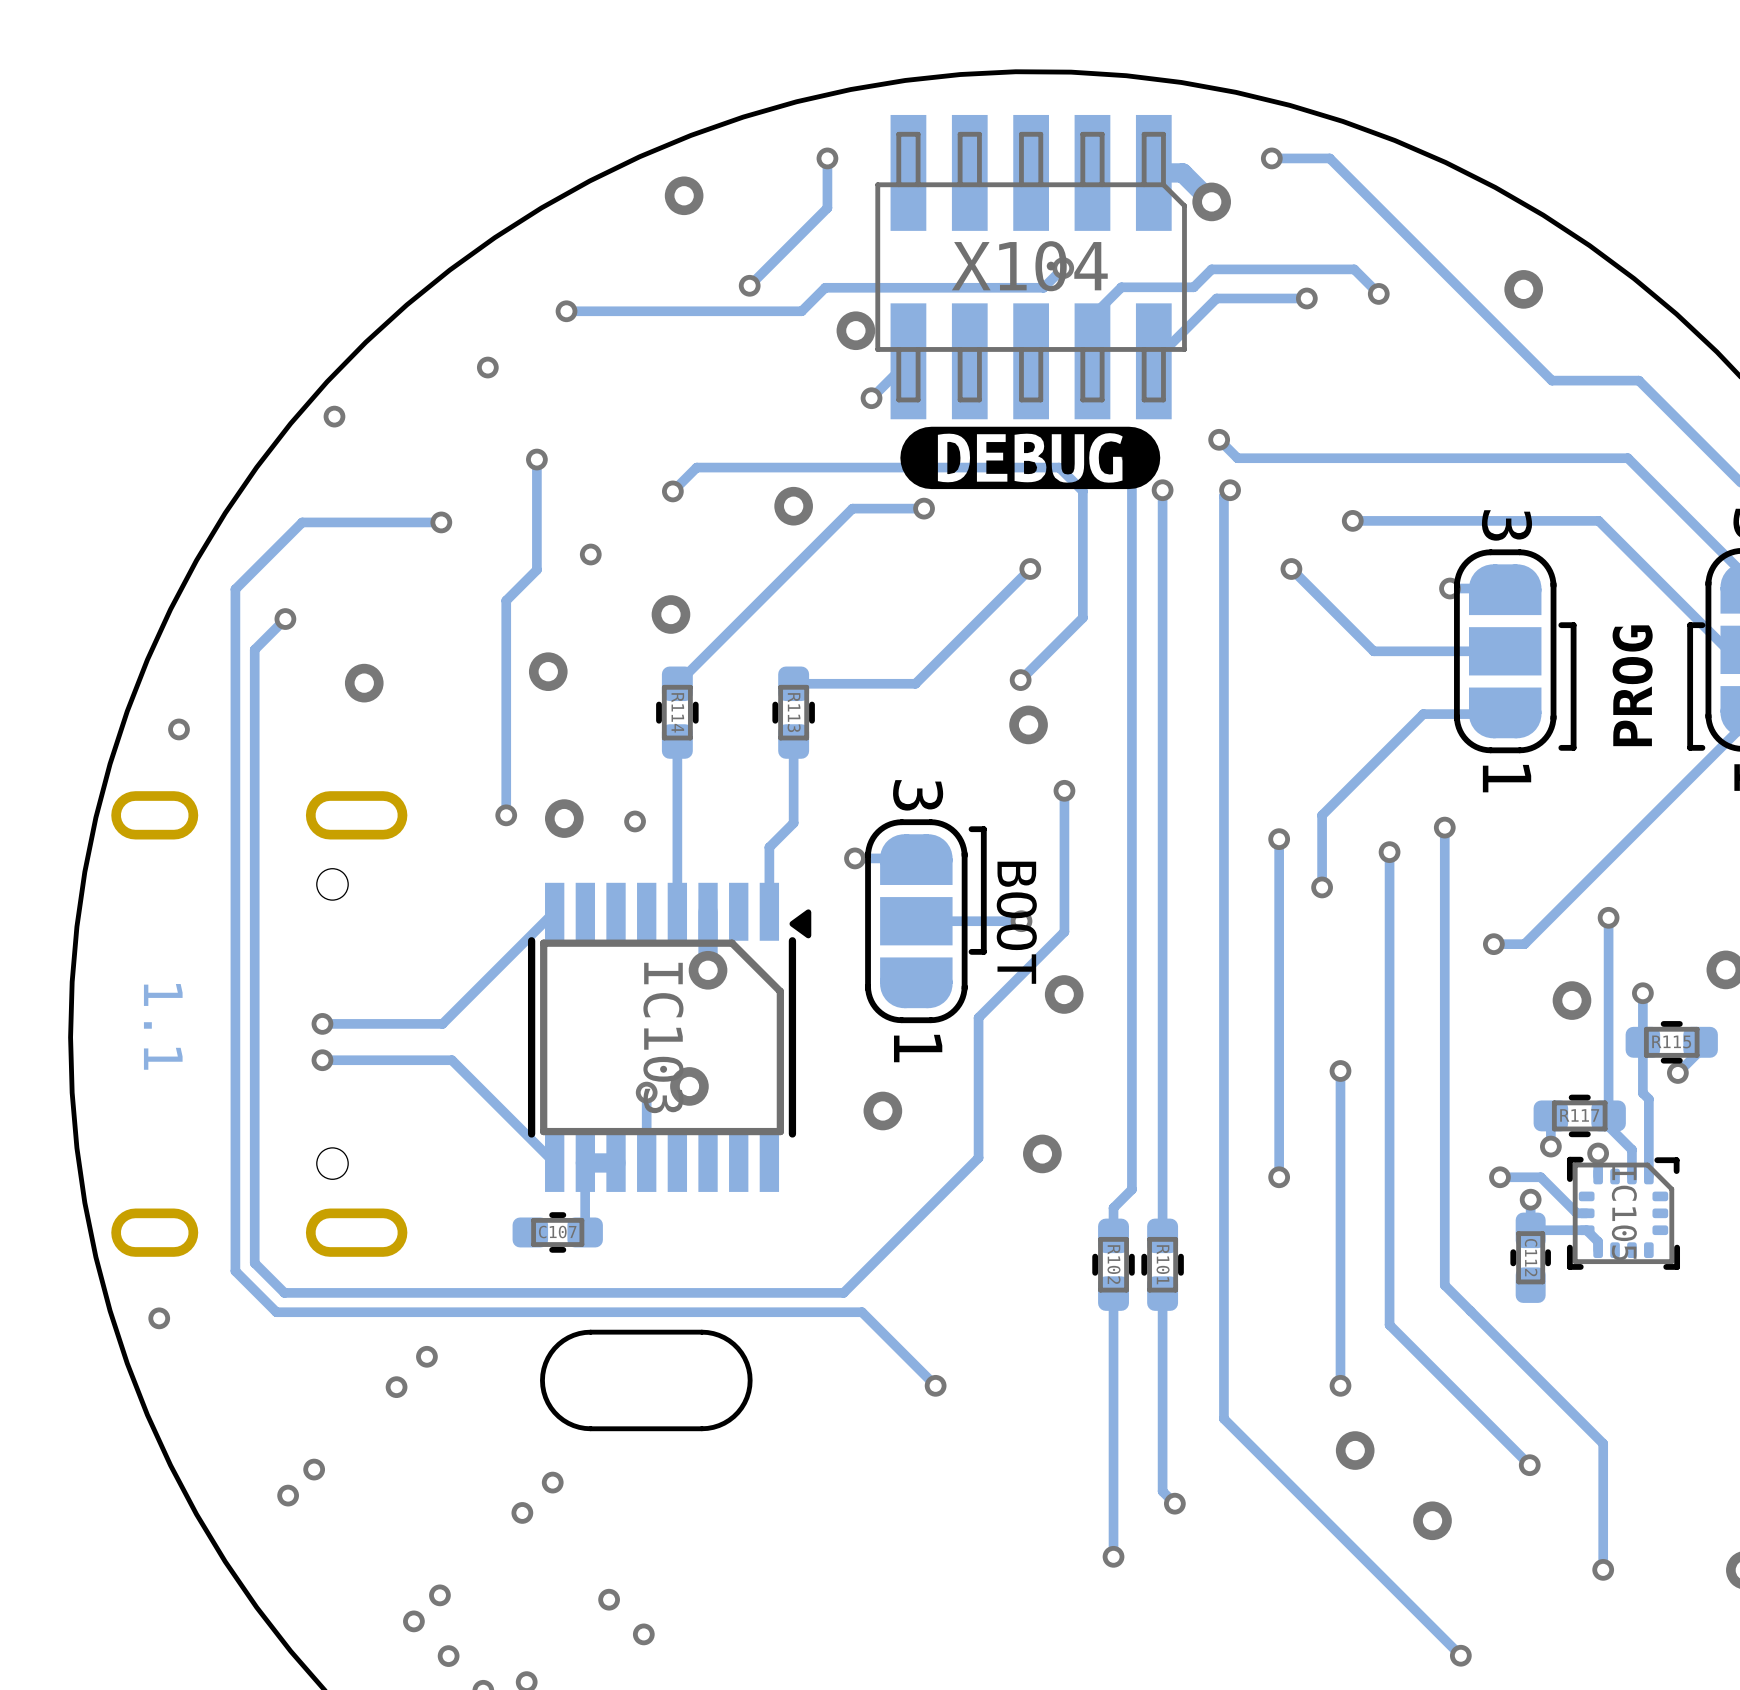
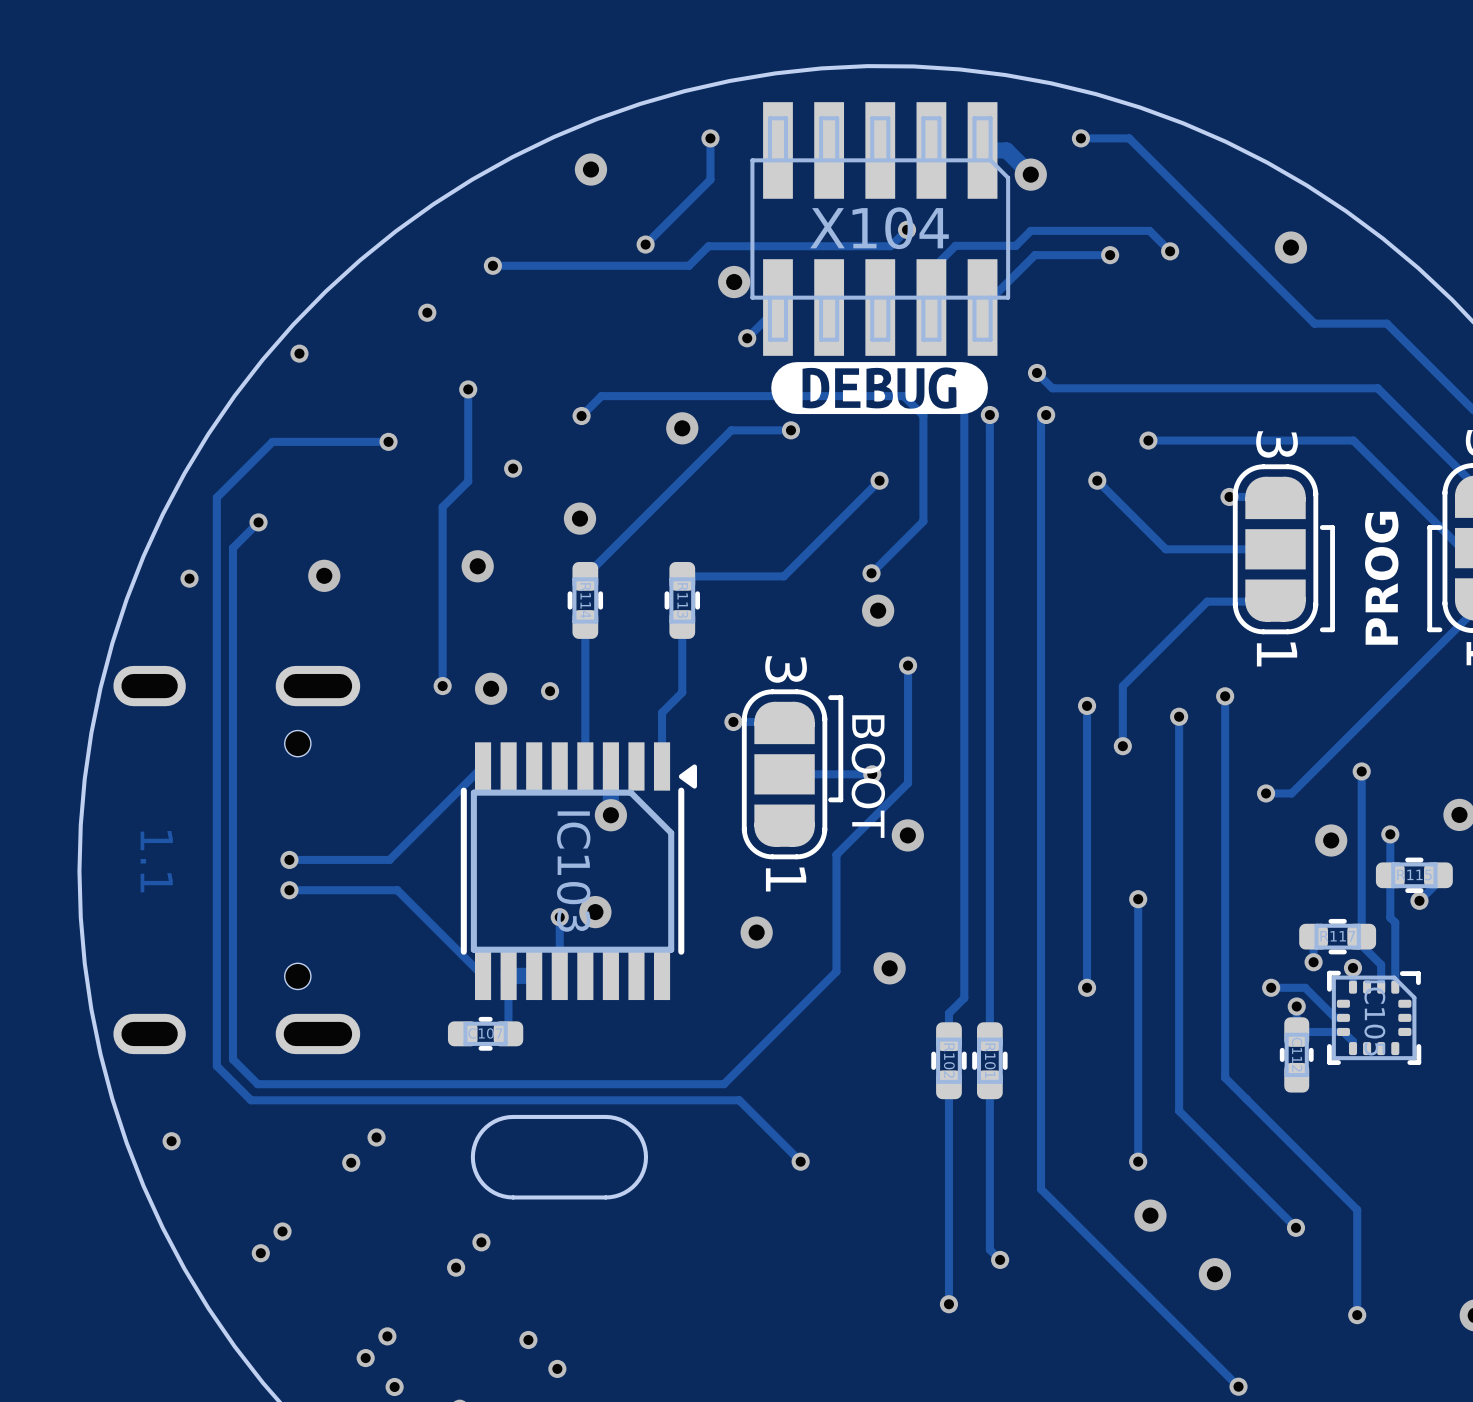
via position: (178, 729) -> (189, 578)
via position: (159, 1318) -> (171, 1141)

